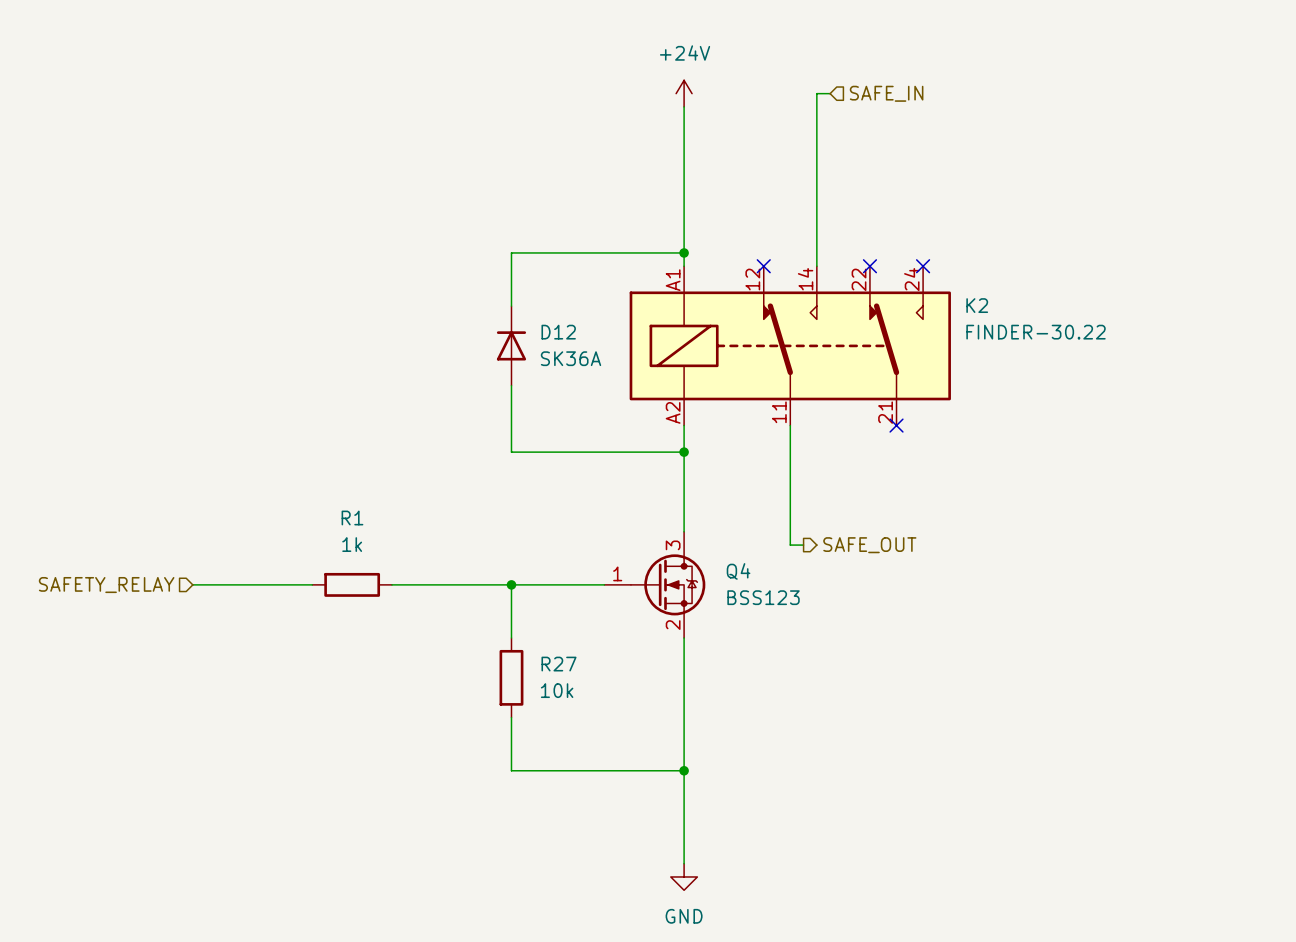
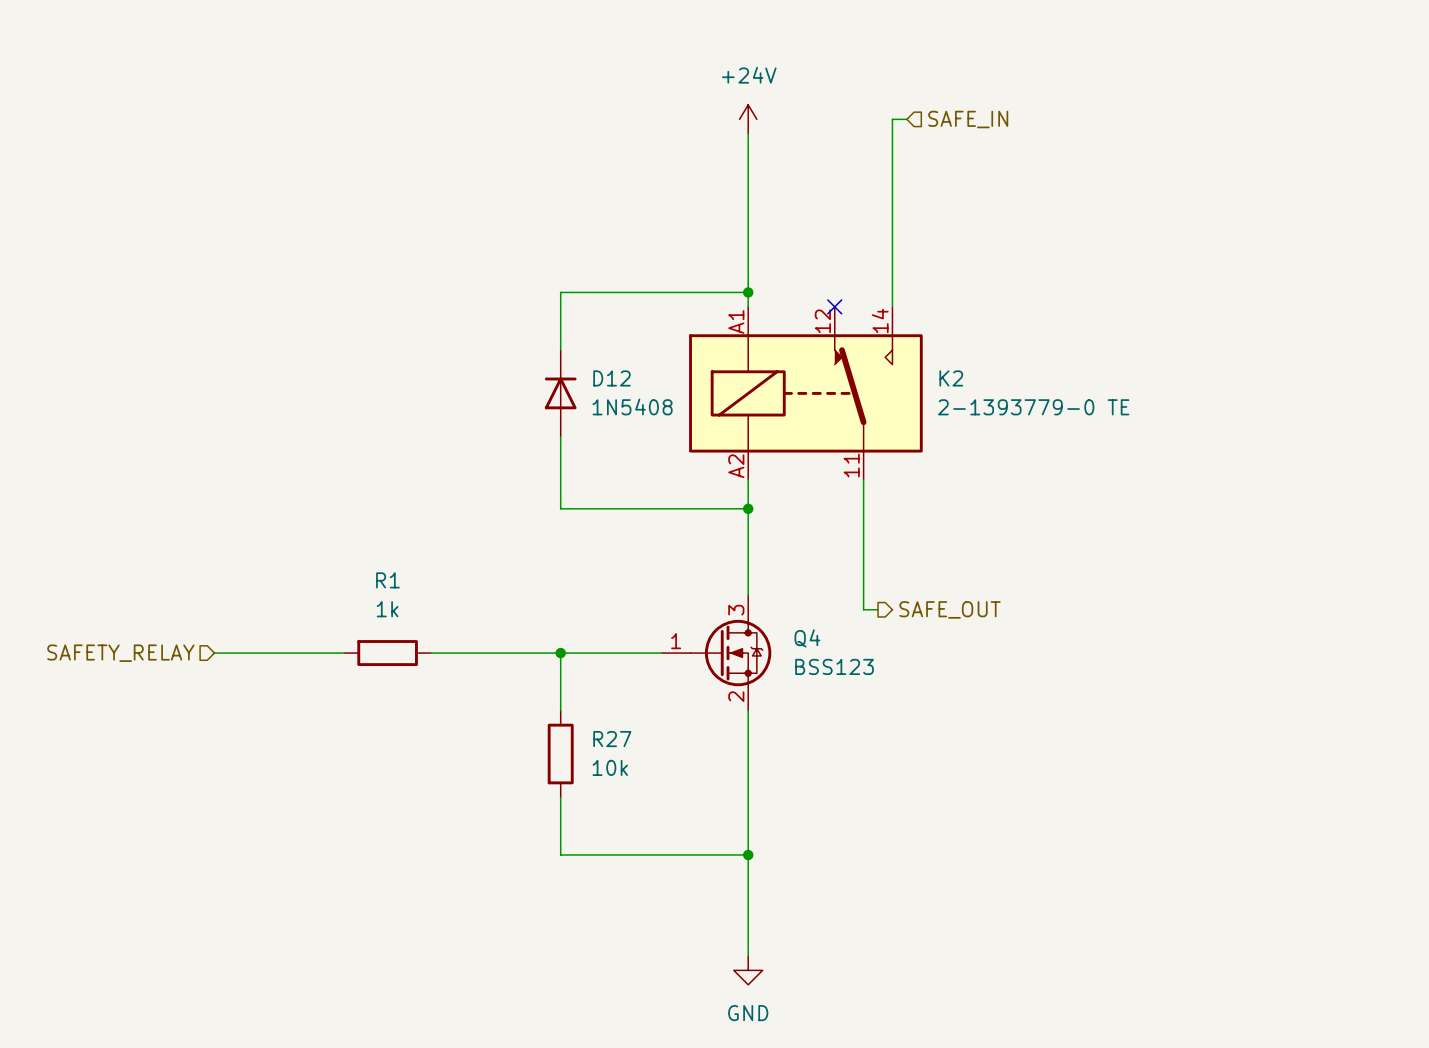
K2 symbol: [629, 266, 951, 426] -> [689, 306, 923, 480]
no-connect mark: (869, 266) -> none
no-connect mark: (923, 266) -> none
K2 name position: K2 (977, 305) -> K2 (951, 378)
K2 value: FINDER-30.22 (1036, 332) -> 2-1393779-0 TE (1033, 407)
D12 value: SK36A (571, 358) -> 1N5408 (632, 406)
no-connect mark: (896, 425) -> none

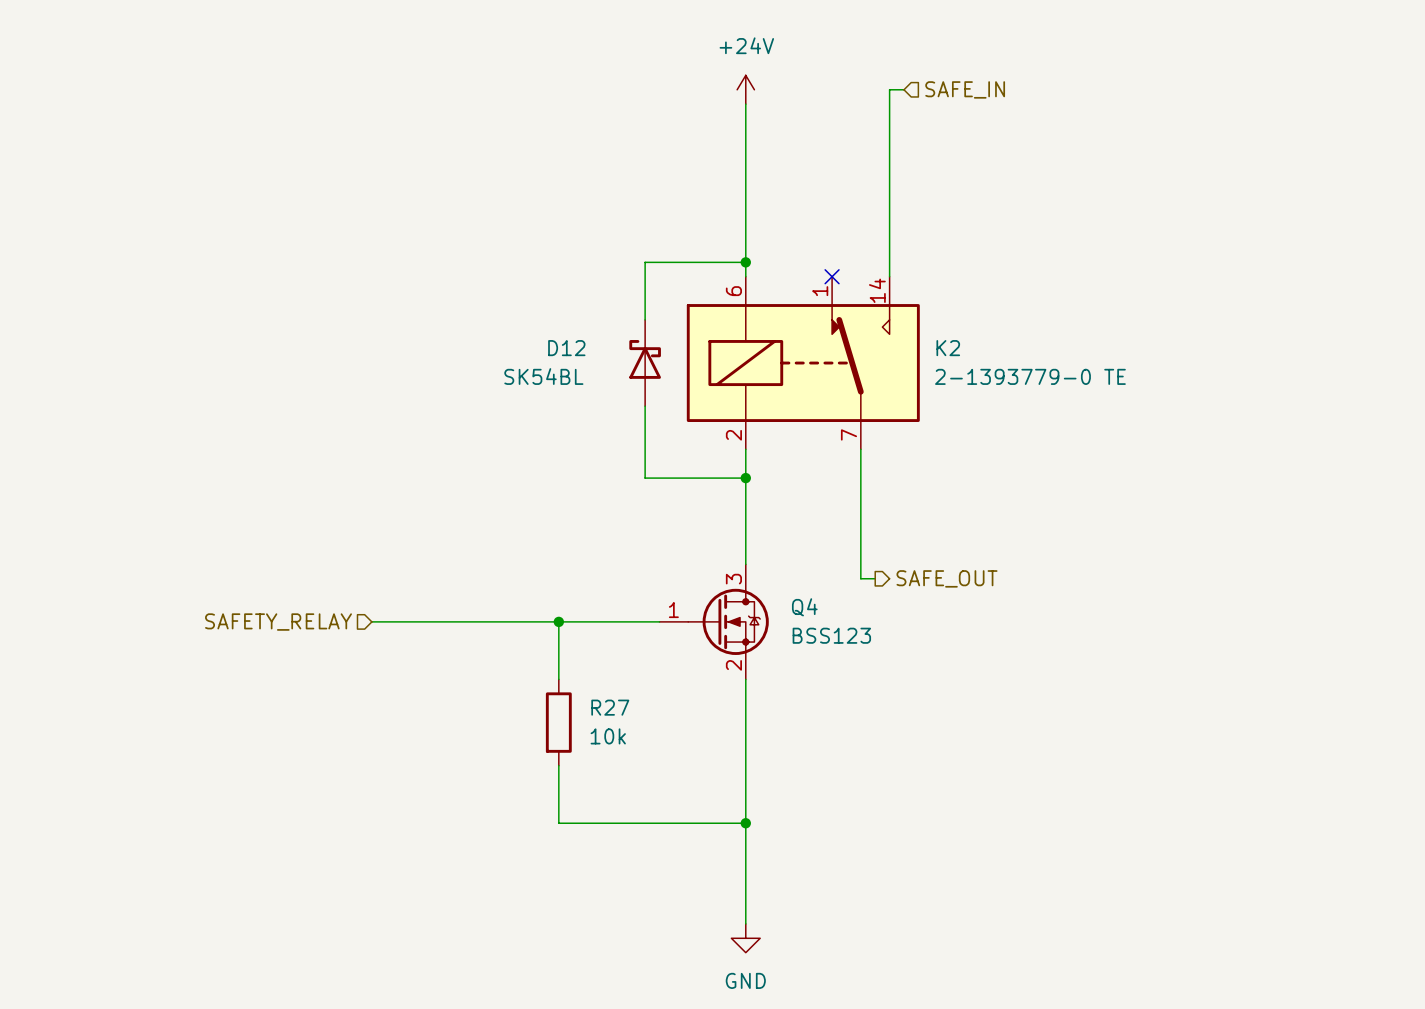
wire: (647, 292) (560, 292) (560, 350) -> (645, 262) (645, 319)
K2 symbol: [689, 306, 923, 480] -> [686, 276, 920, 450]
D12 symbol: [544, 350, 577, 437] -> [629, 319, 661, 407]
D12 name position: D12 (611, 378) -> D12 (566, 348)
D12 value: 1N5408 (632, 406) -> SK54BL (543, 376)
wire: (560, 436) (560, 508) (647, 508) -> (645, 406) (645, 478)
hierarchical label position: SAFETY_RELAY (120, 653) -> SAFETY_RELAY (278, 622)
wire: (214, 653) (344, 653) -> none
wire: none -> (371, 621) (429, 621)
R1: 1k (387, 653) -> none

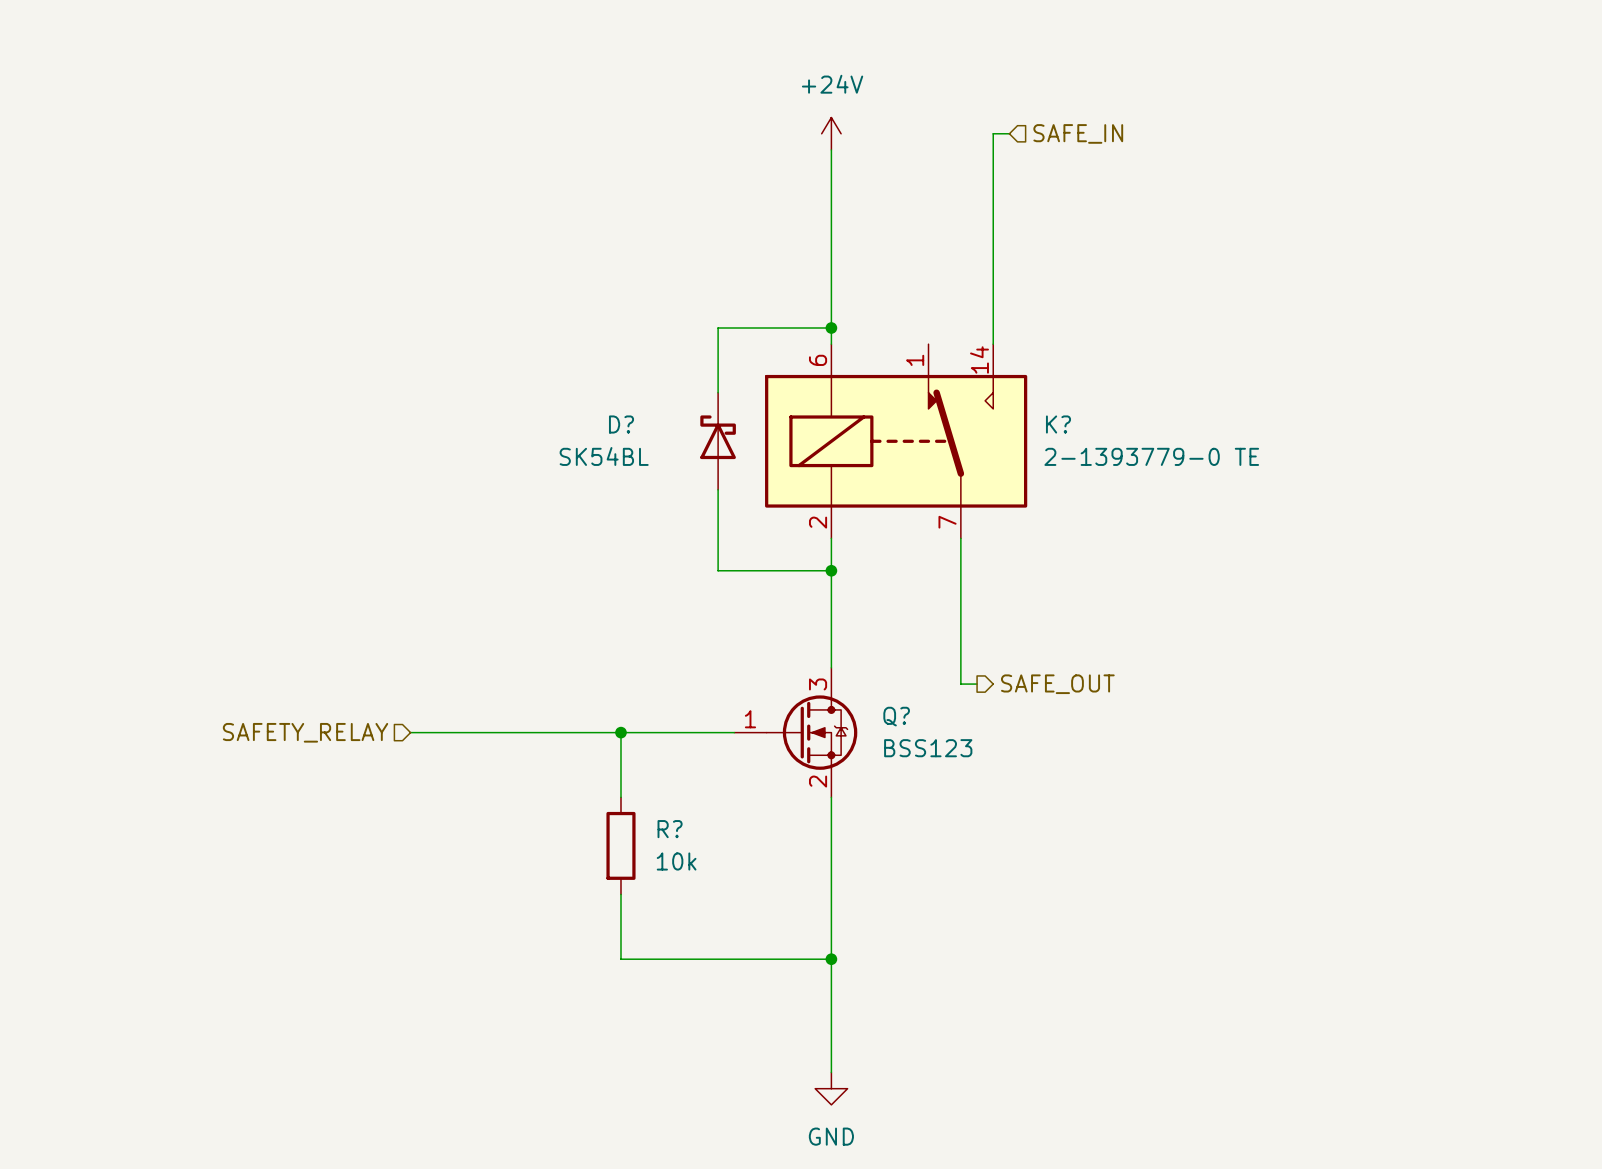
no-connect mark: (832, 276) -> none
D12 name: D12 (566, 348) -> D? (621, 424)
K2 name: K2 (948, 348) -> K? (1058, 424)
Q4 name: Q4 (804, 607) -> Q? (896, 716)
R27 name: R27 (610, 707) -> R? (670, 829)

